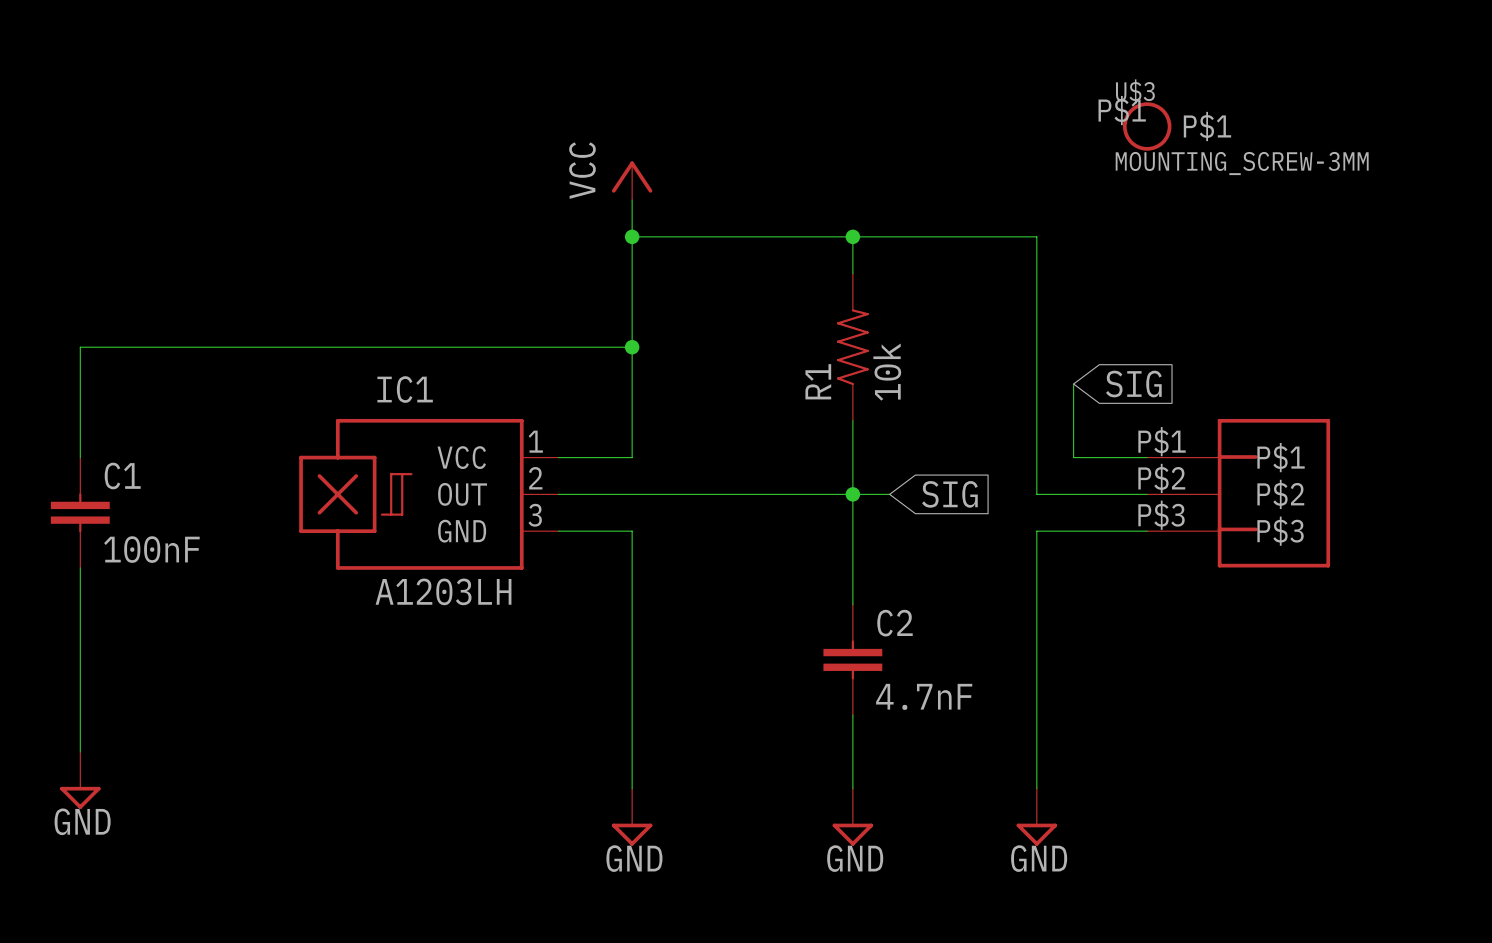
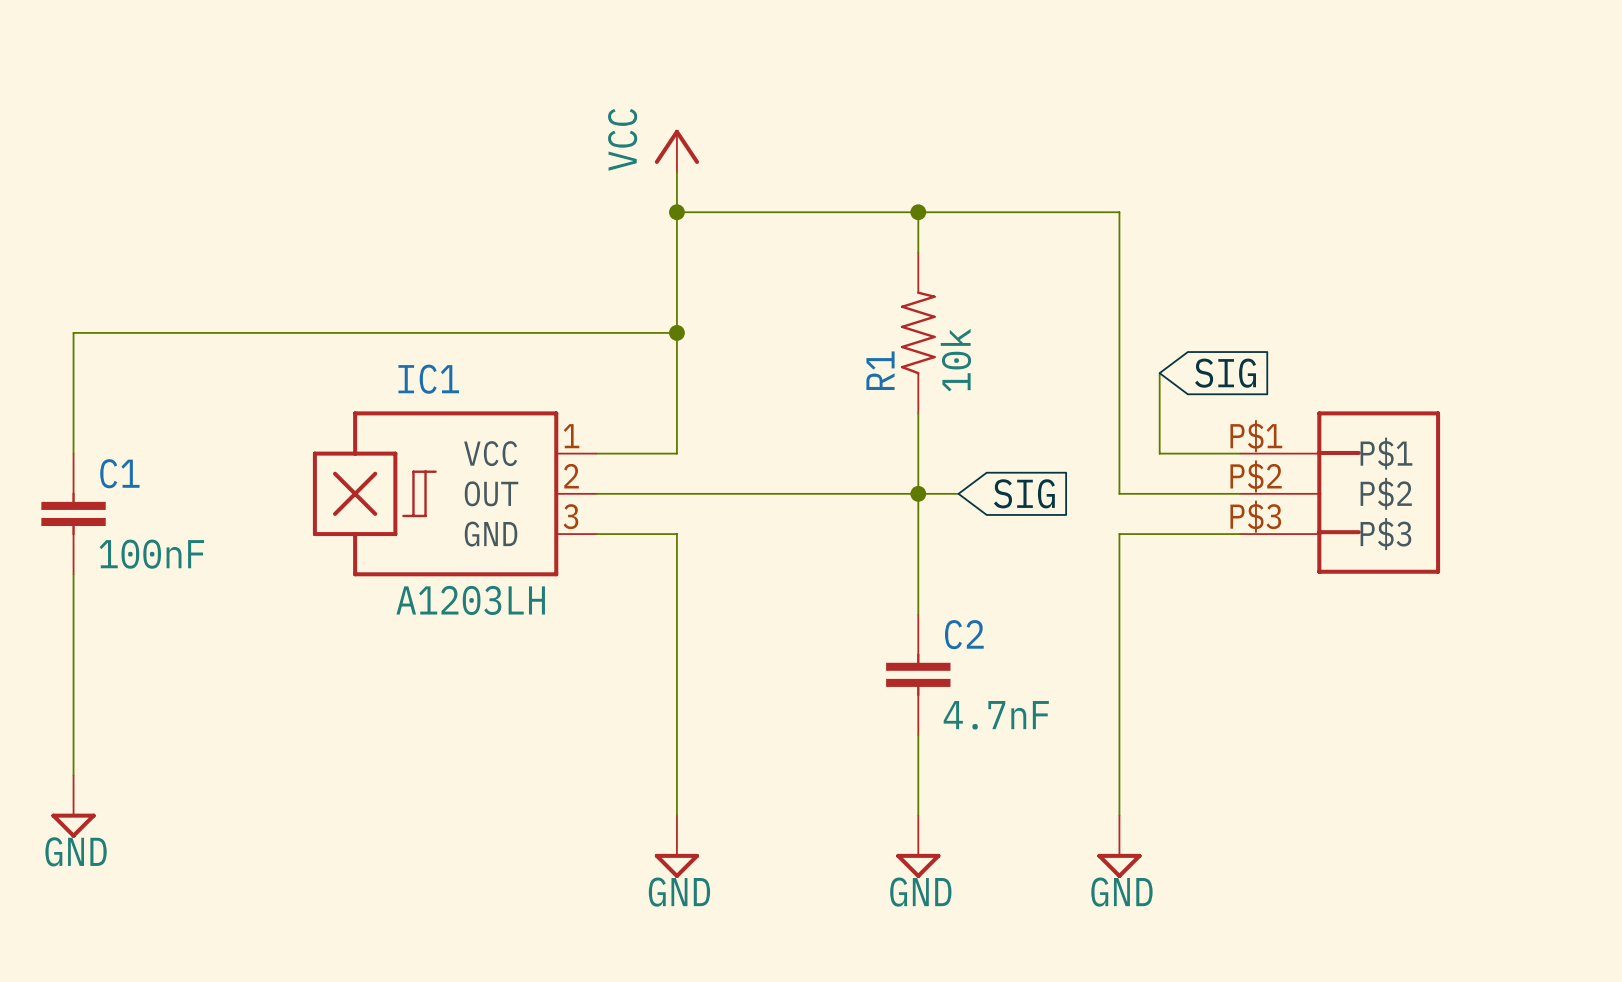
U$3: MOUNTING_SCREW-3MM (1147, 126) -> none

